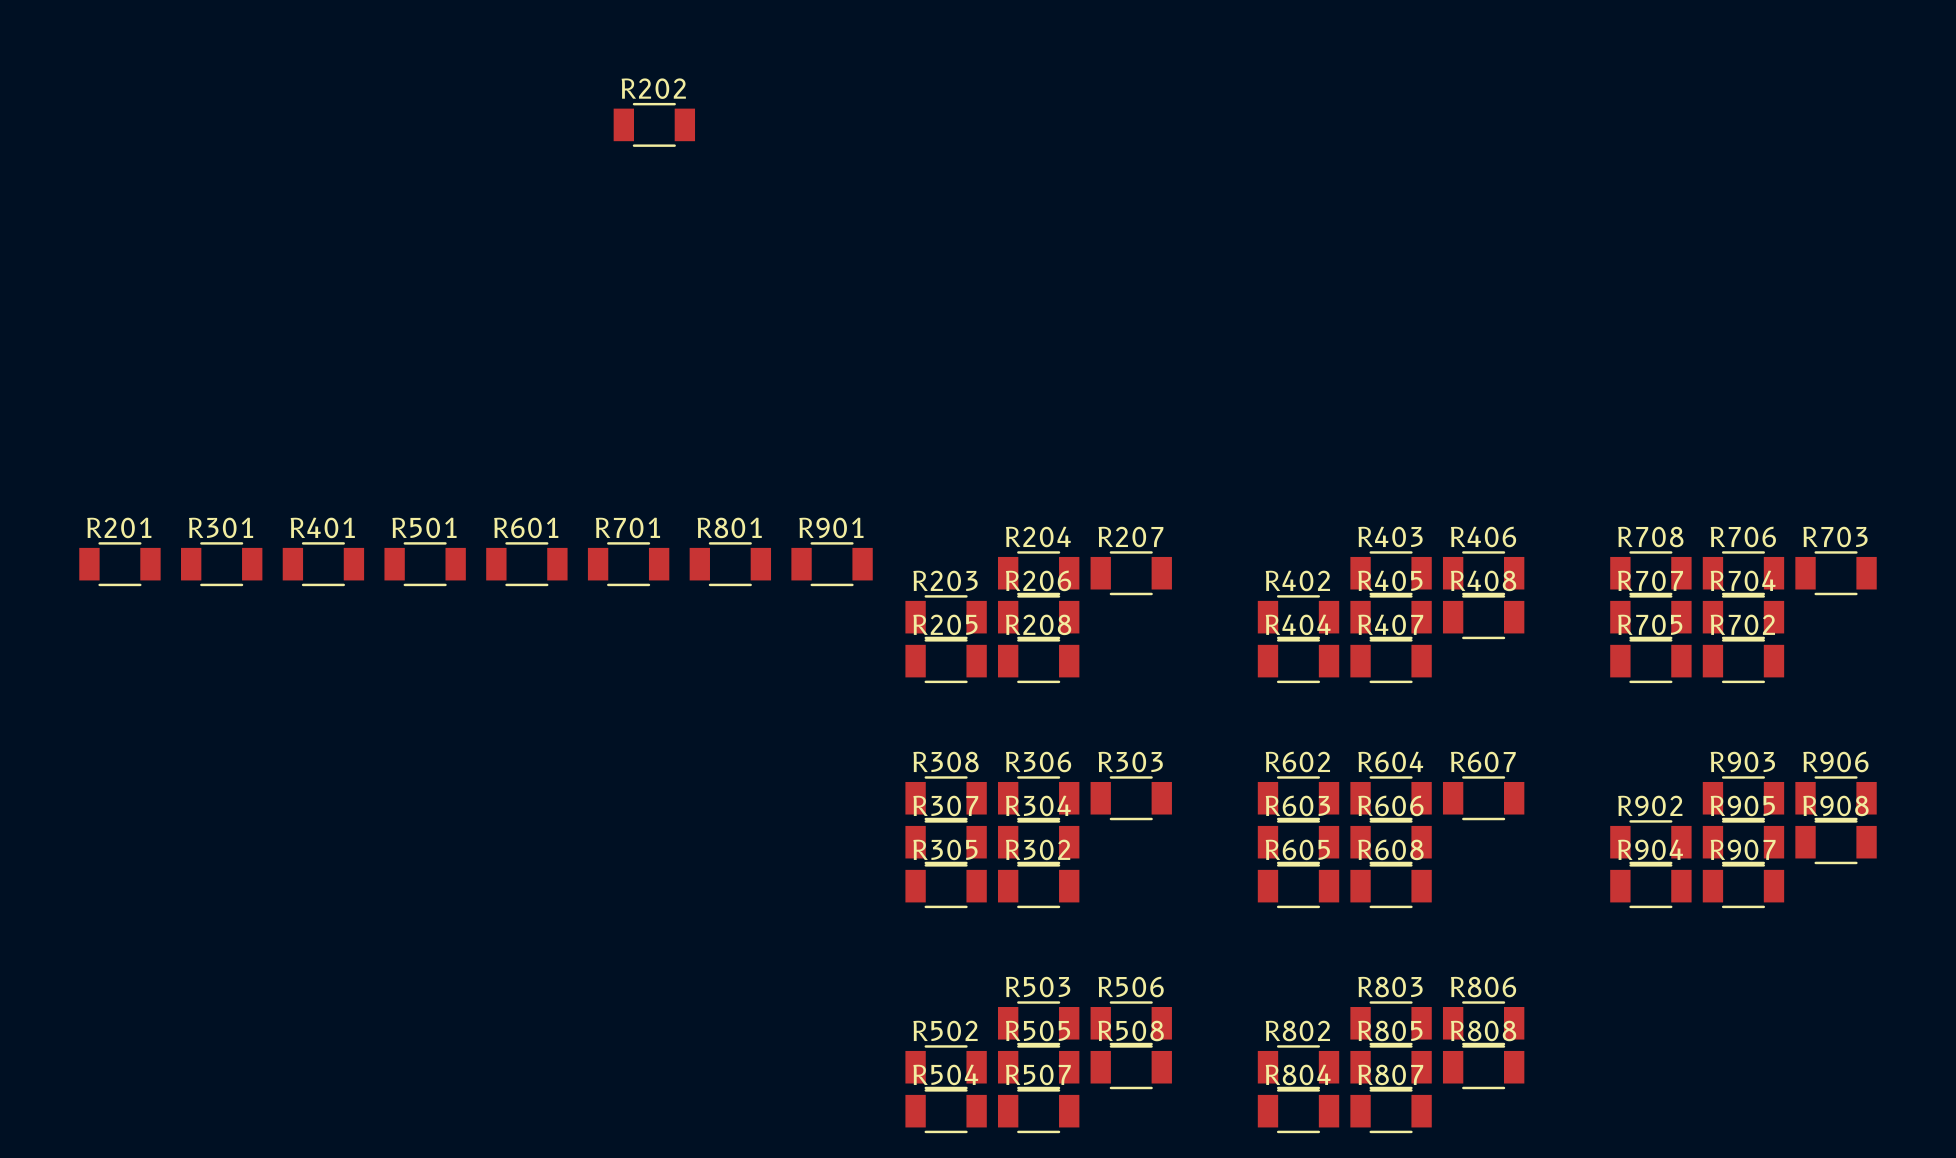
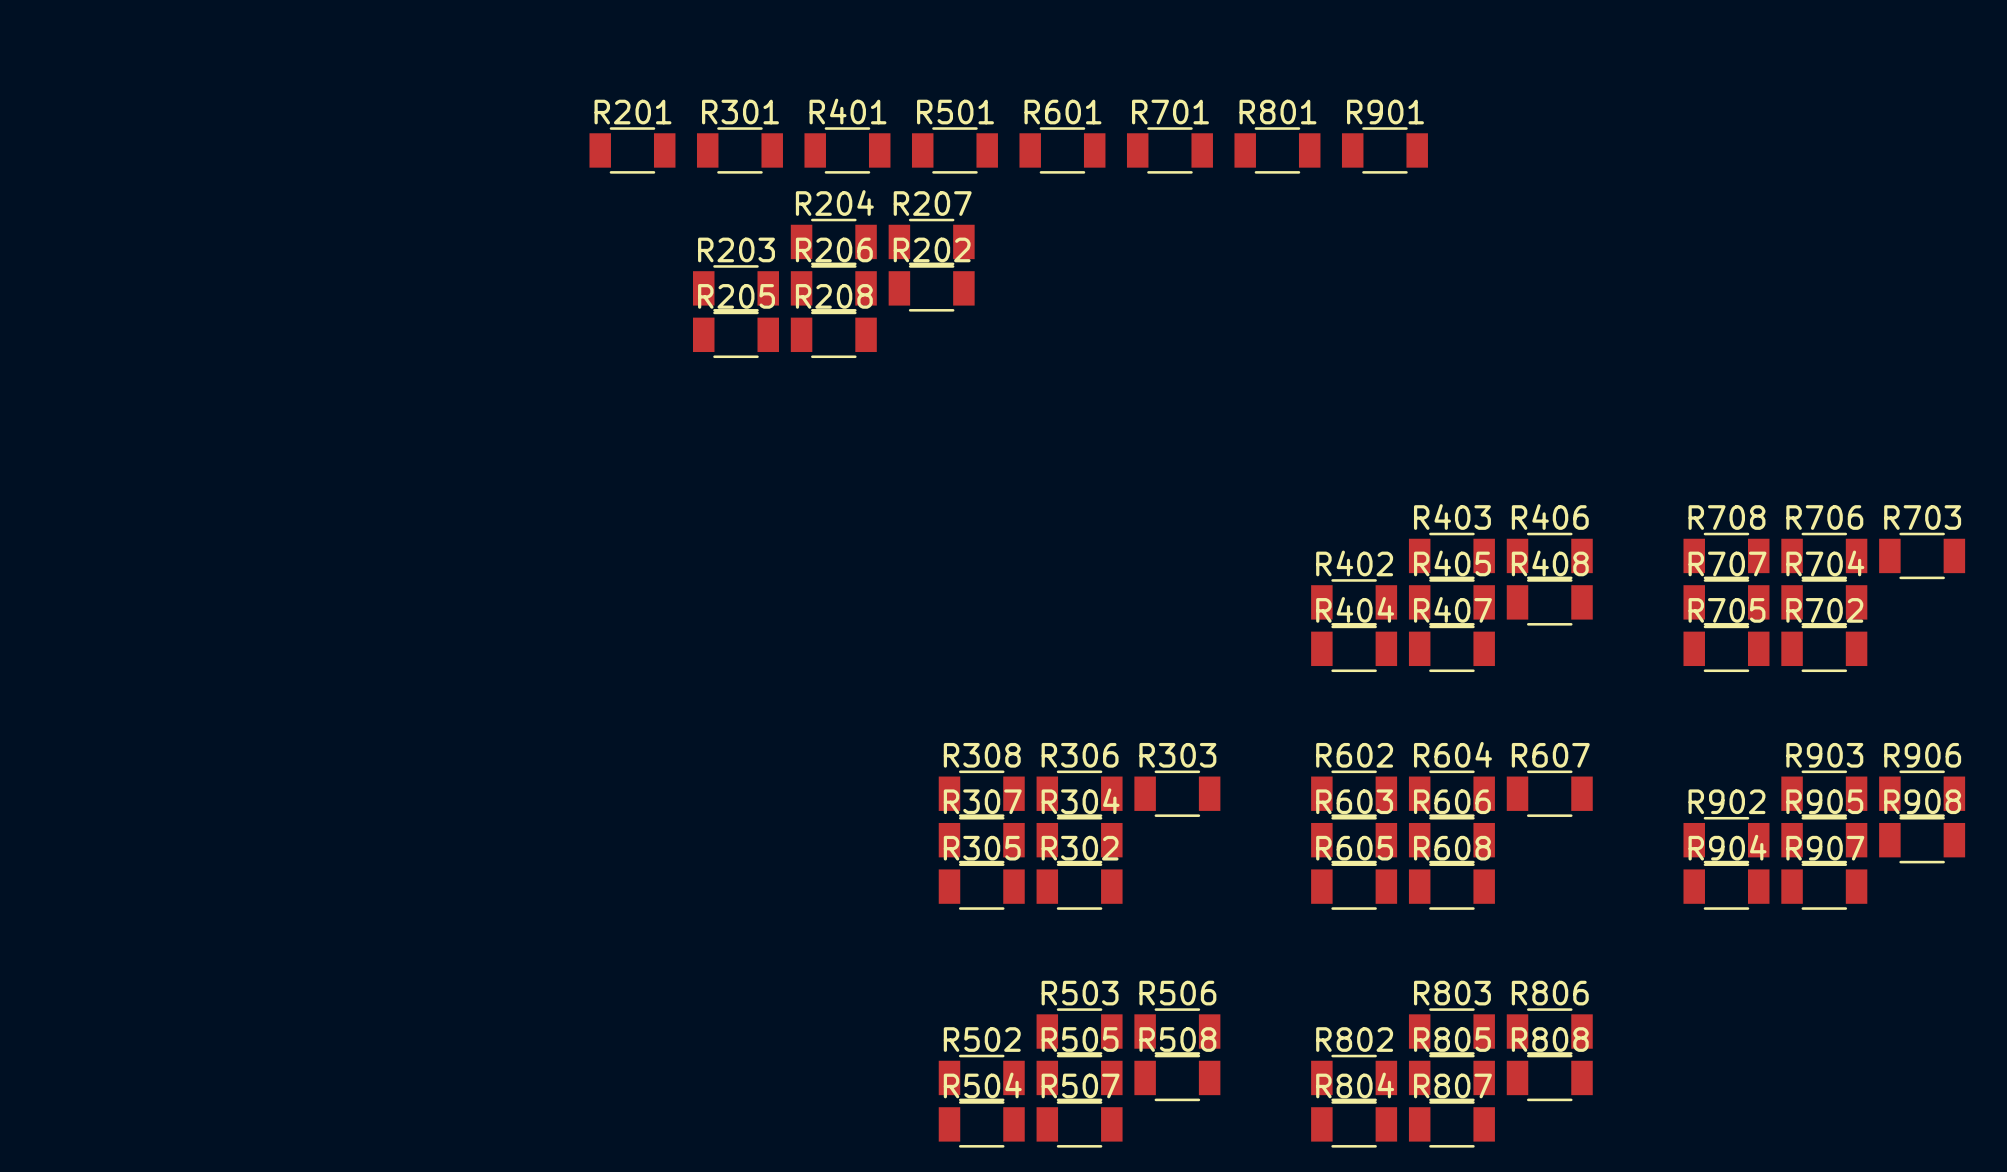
R202 position: (654, 124) -> (931, 288)
R201 position: (119, 564) -> (632, 150)
R301 position: (221, 564) -> (739, 150)
R401 position: (323, 564) -> (847, 150)
R501 position: (425, 564) -> (954, 150)
R601 position: (526, 564) -> (1062, 150)
R701 position: (628, 564) -> (1169, 150)
R801 position: (730, 564) -> (1277, 150)
R901 position: (832, 564) -> (1384, 150)
R204 position: (1038, 573) -> (833, 241)
R207 position: (1131, 573) -> (931, 241)
R203 position: (946, 617) -> (735, 288)
R206 position: (1038, 617) -> (833, 288)
R205 position: (946, 661) -> (735, 334)
R208 position: (1038, 661) -> (833, 334)

